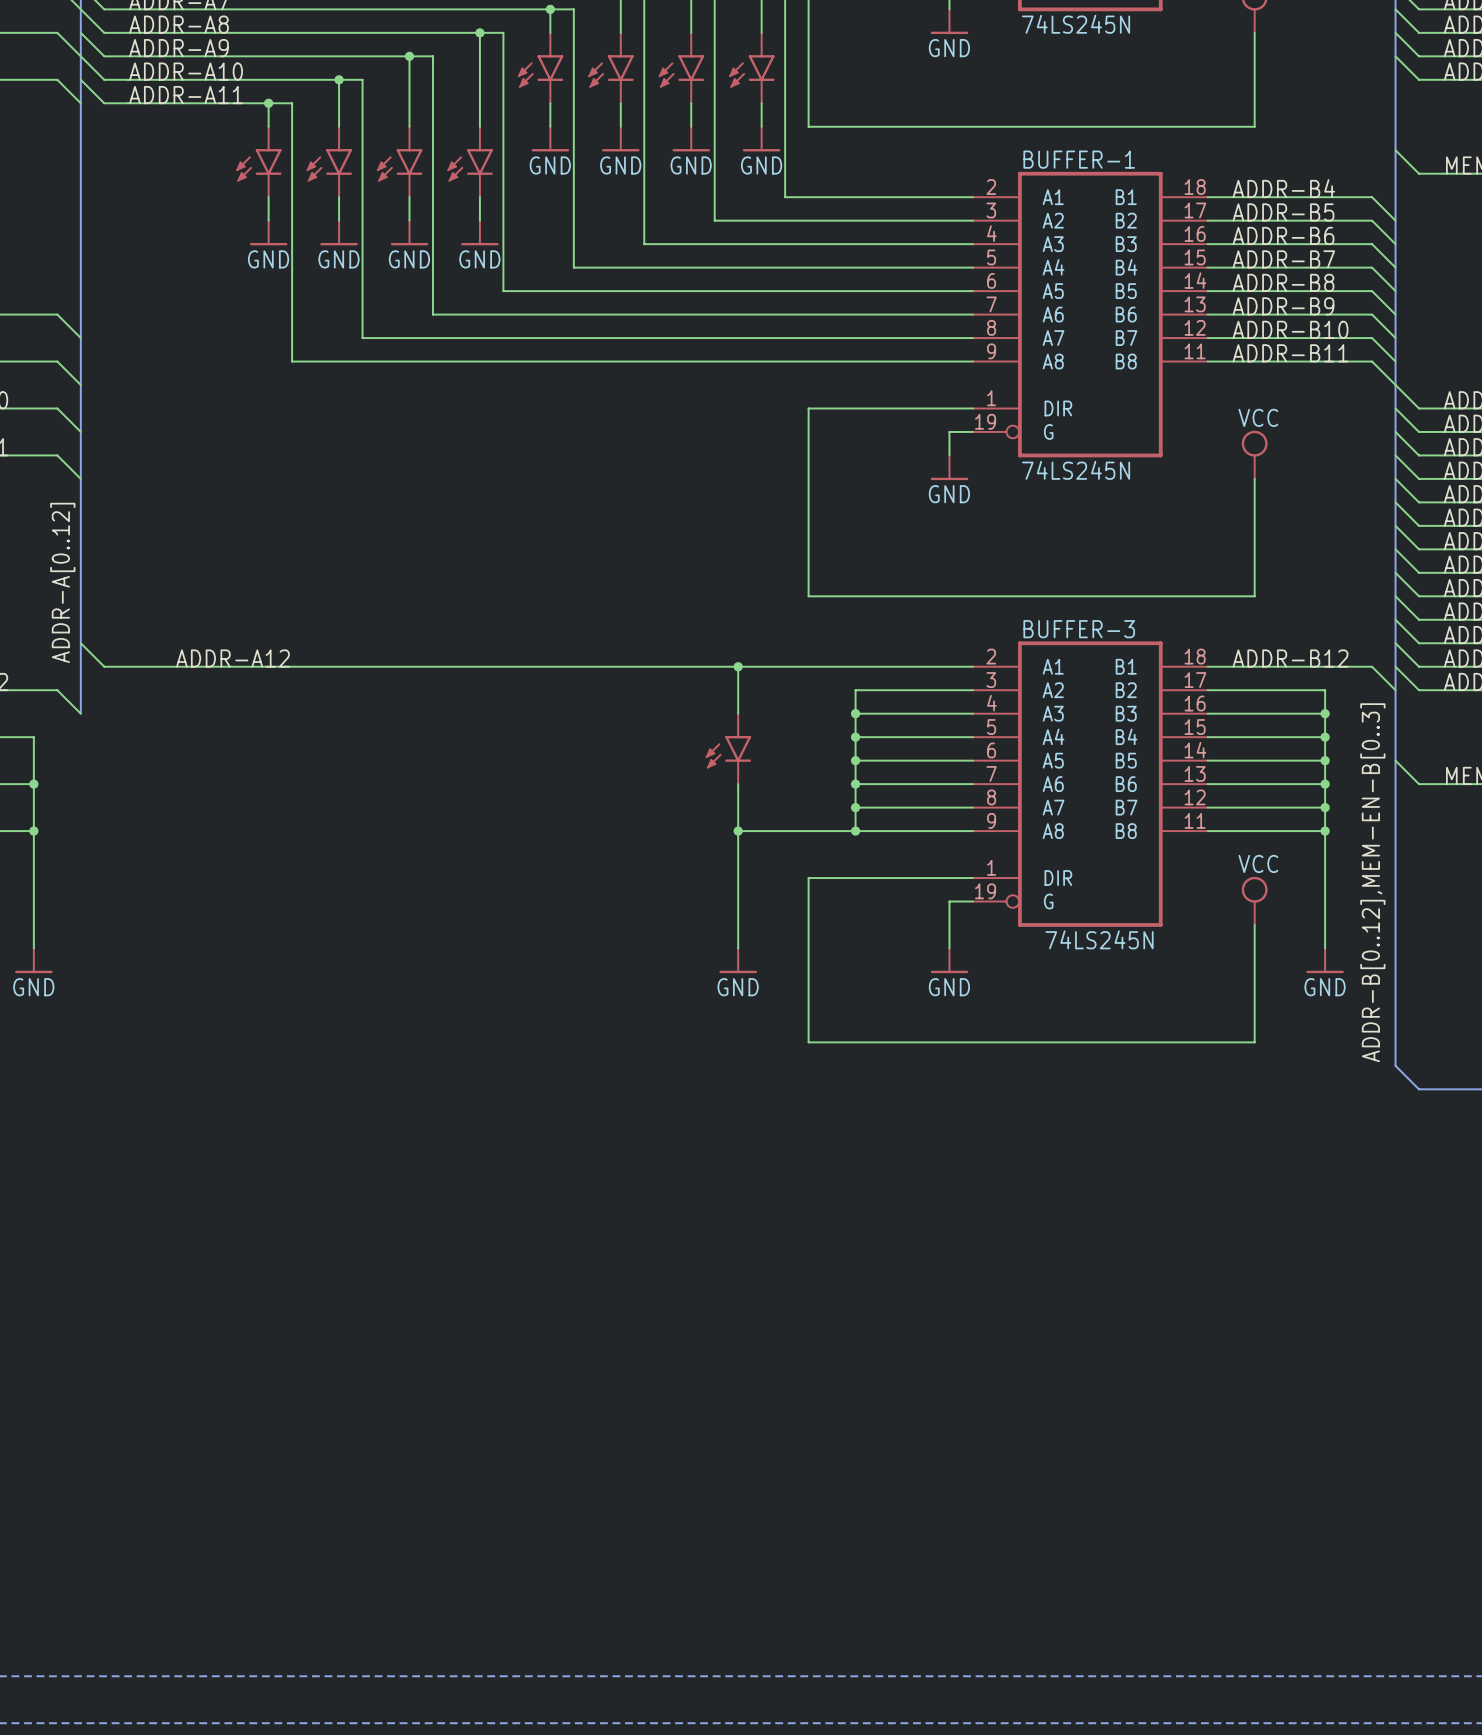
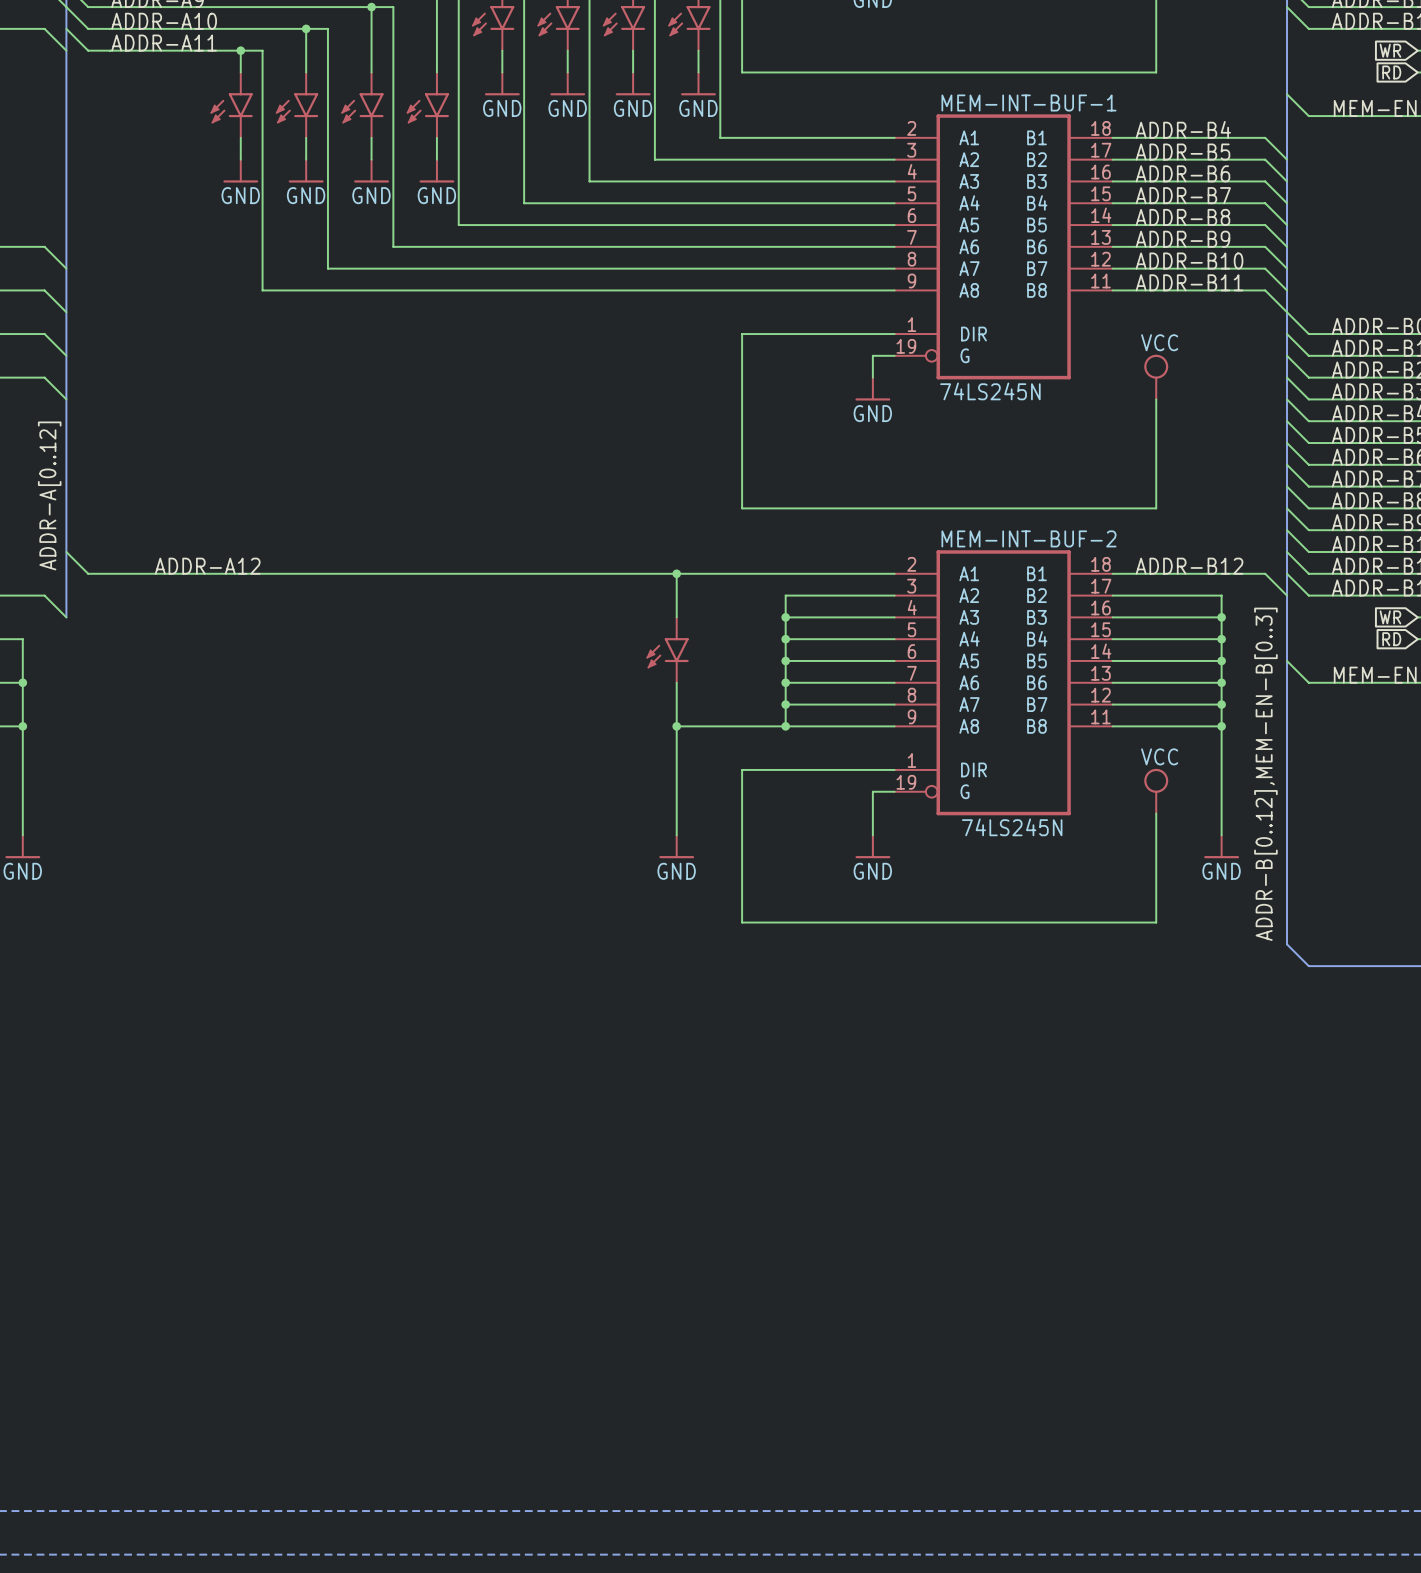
BUFFER-1 name: BUFFER-1 (1079, 159) -> MEM-INT-BUF-1 (1028, 102)
BUFFER-3 name: BUFFER-3 (1079, 629) -> MEM-INT-BUF-2 (1028, 538)

